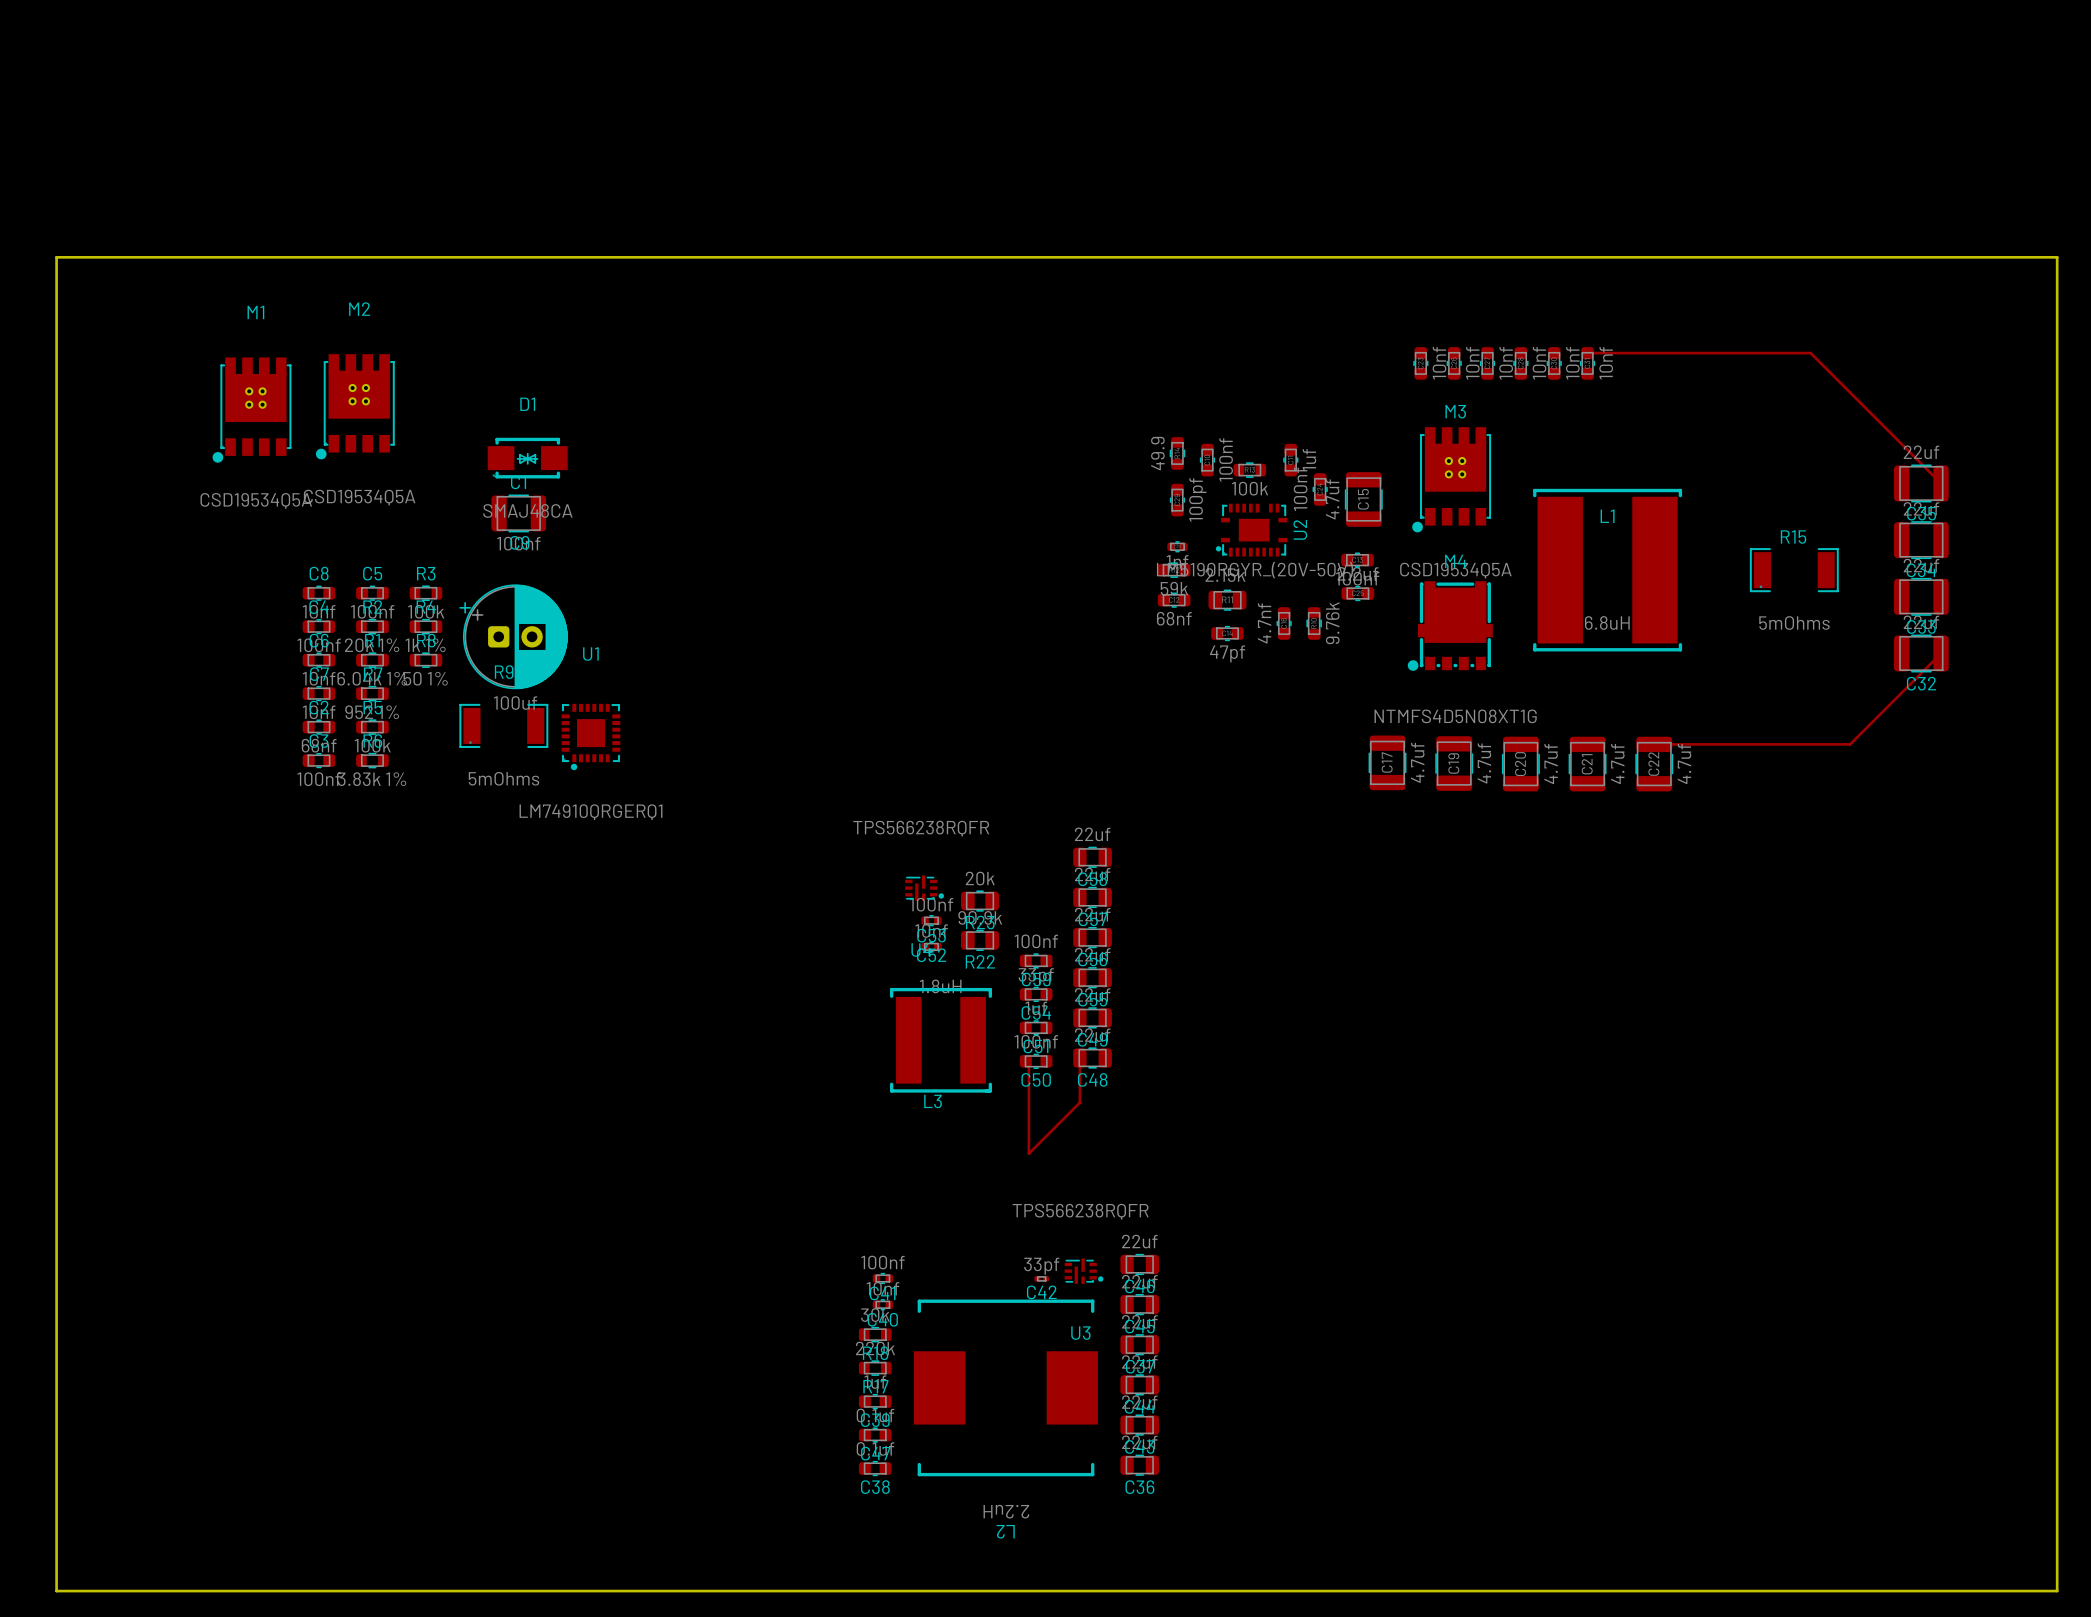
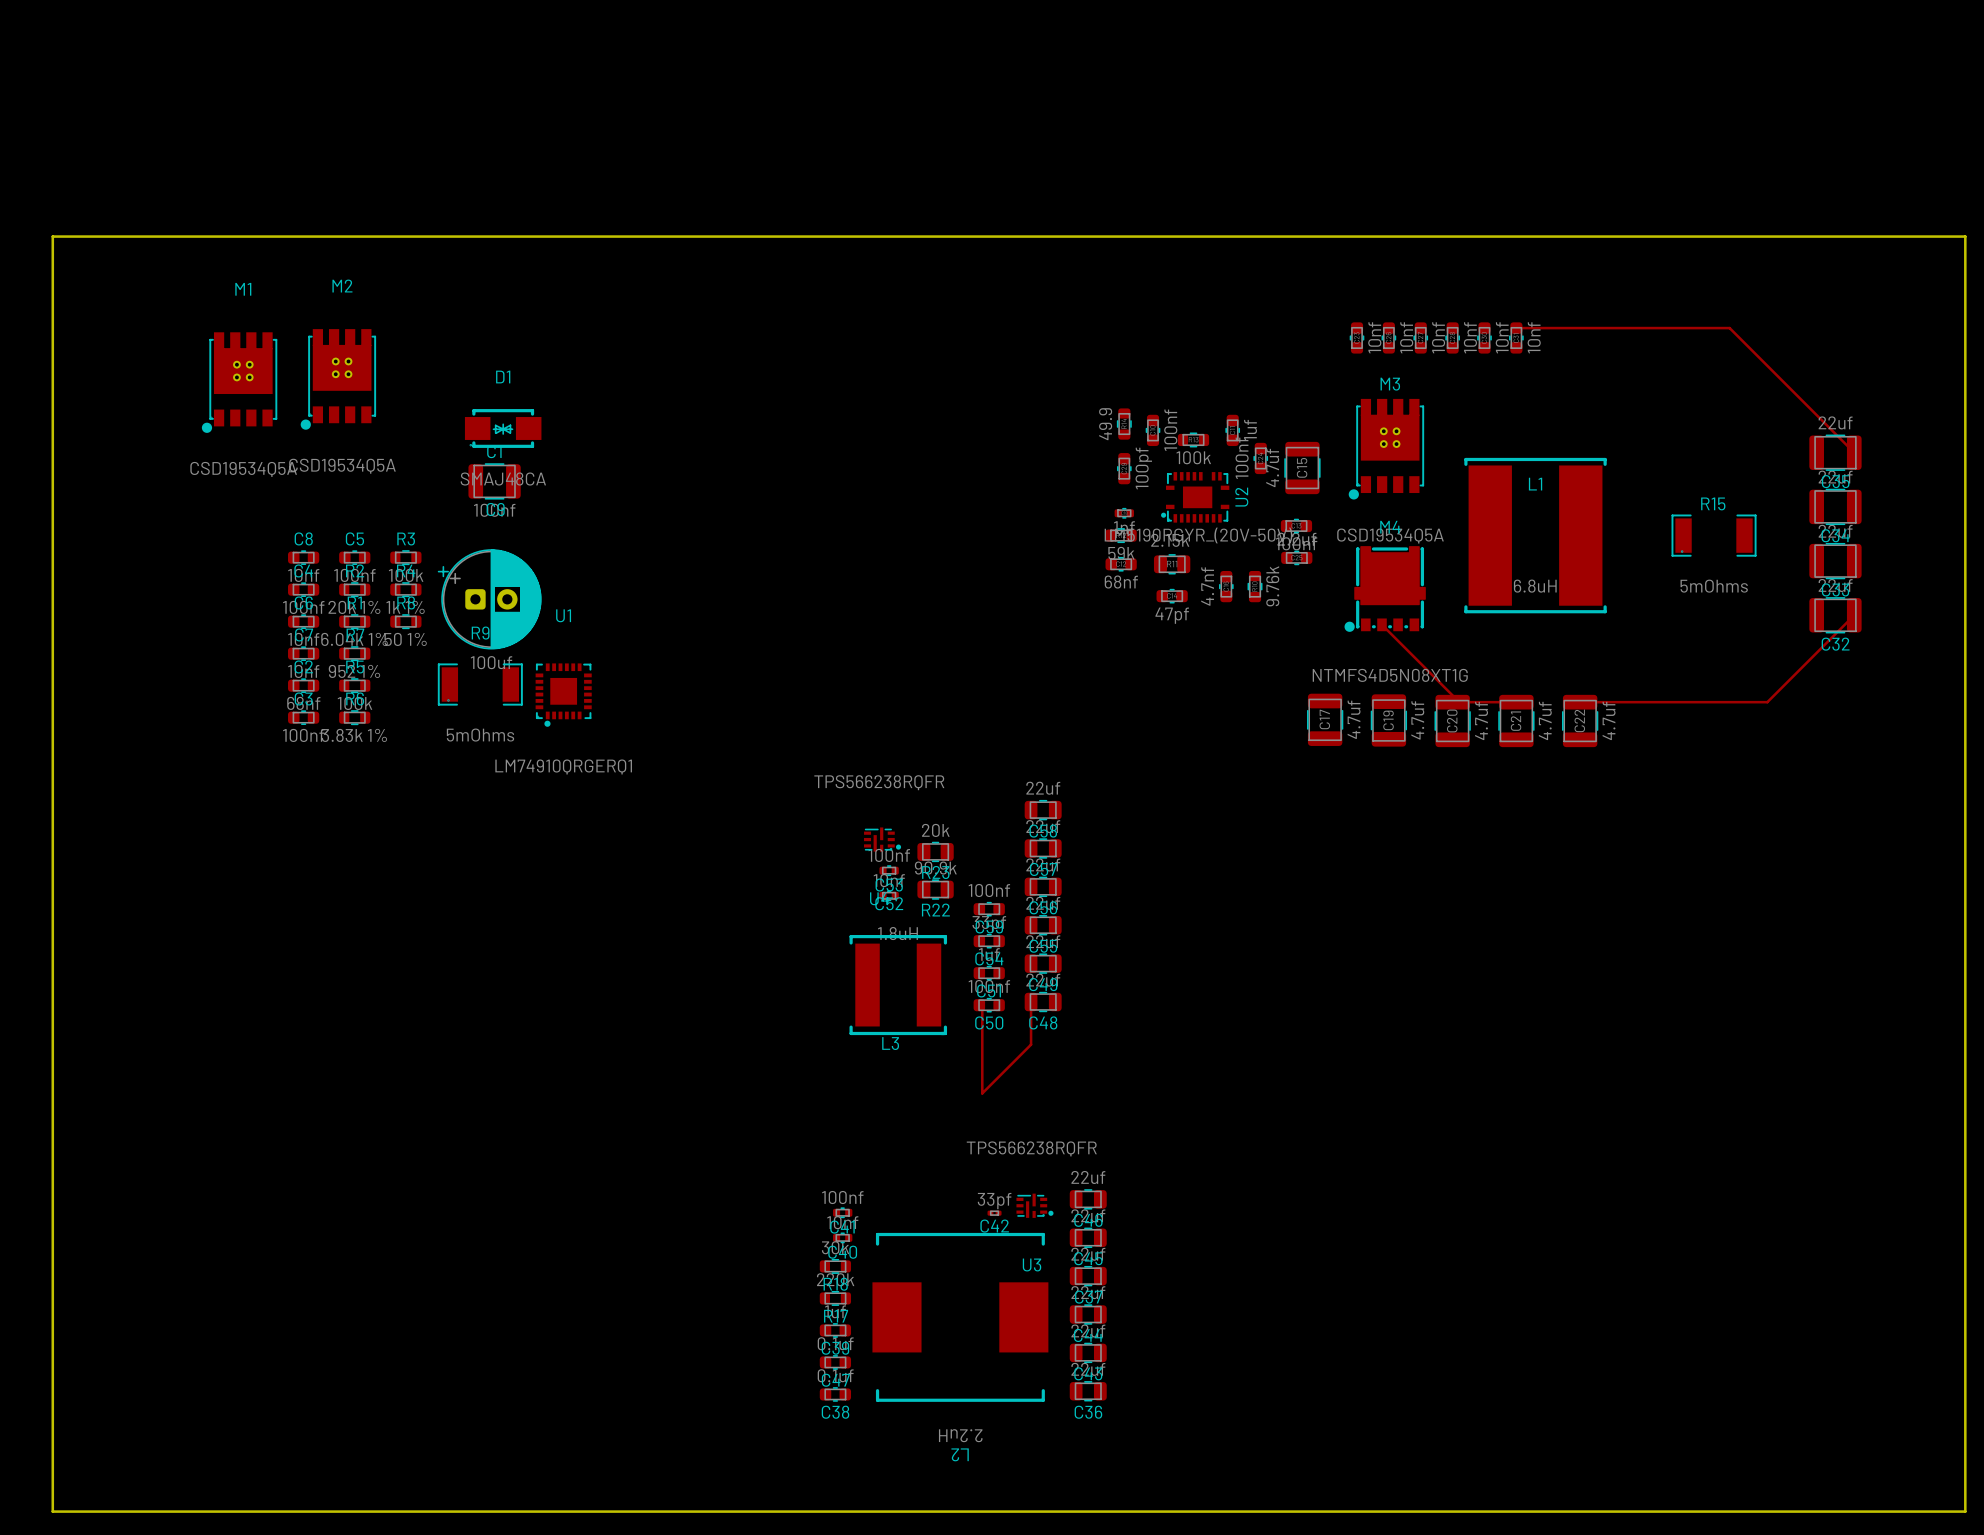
top track: none -> (1382, 624) (1459, 702) (1516, 702)

